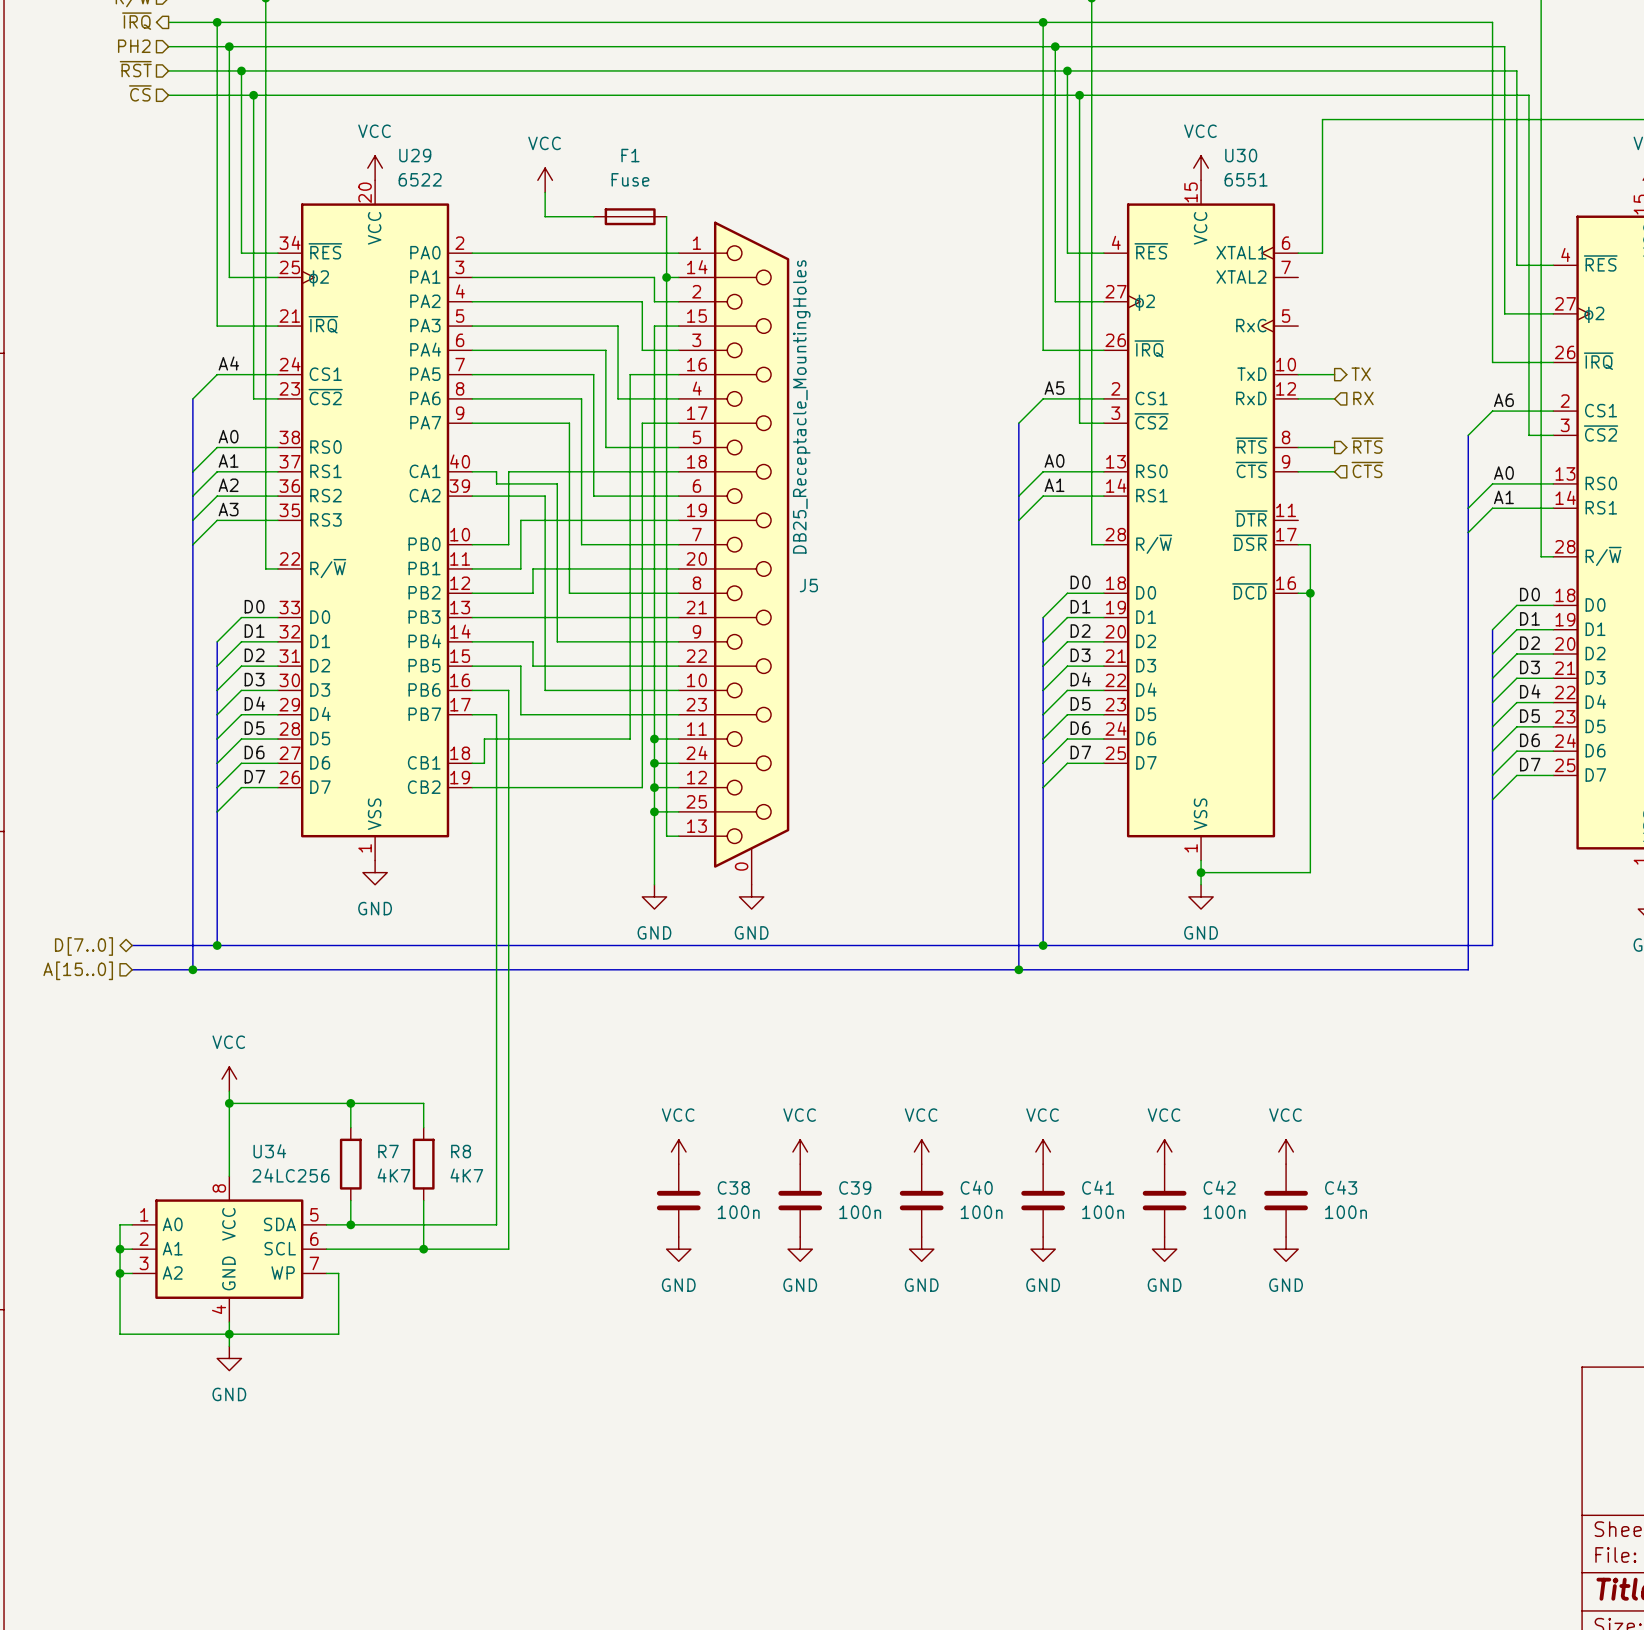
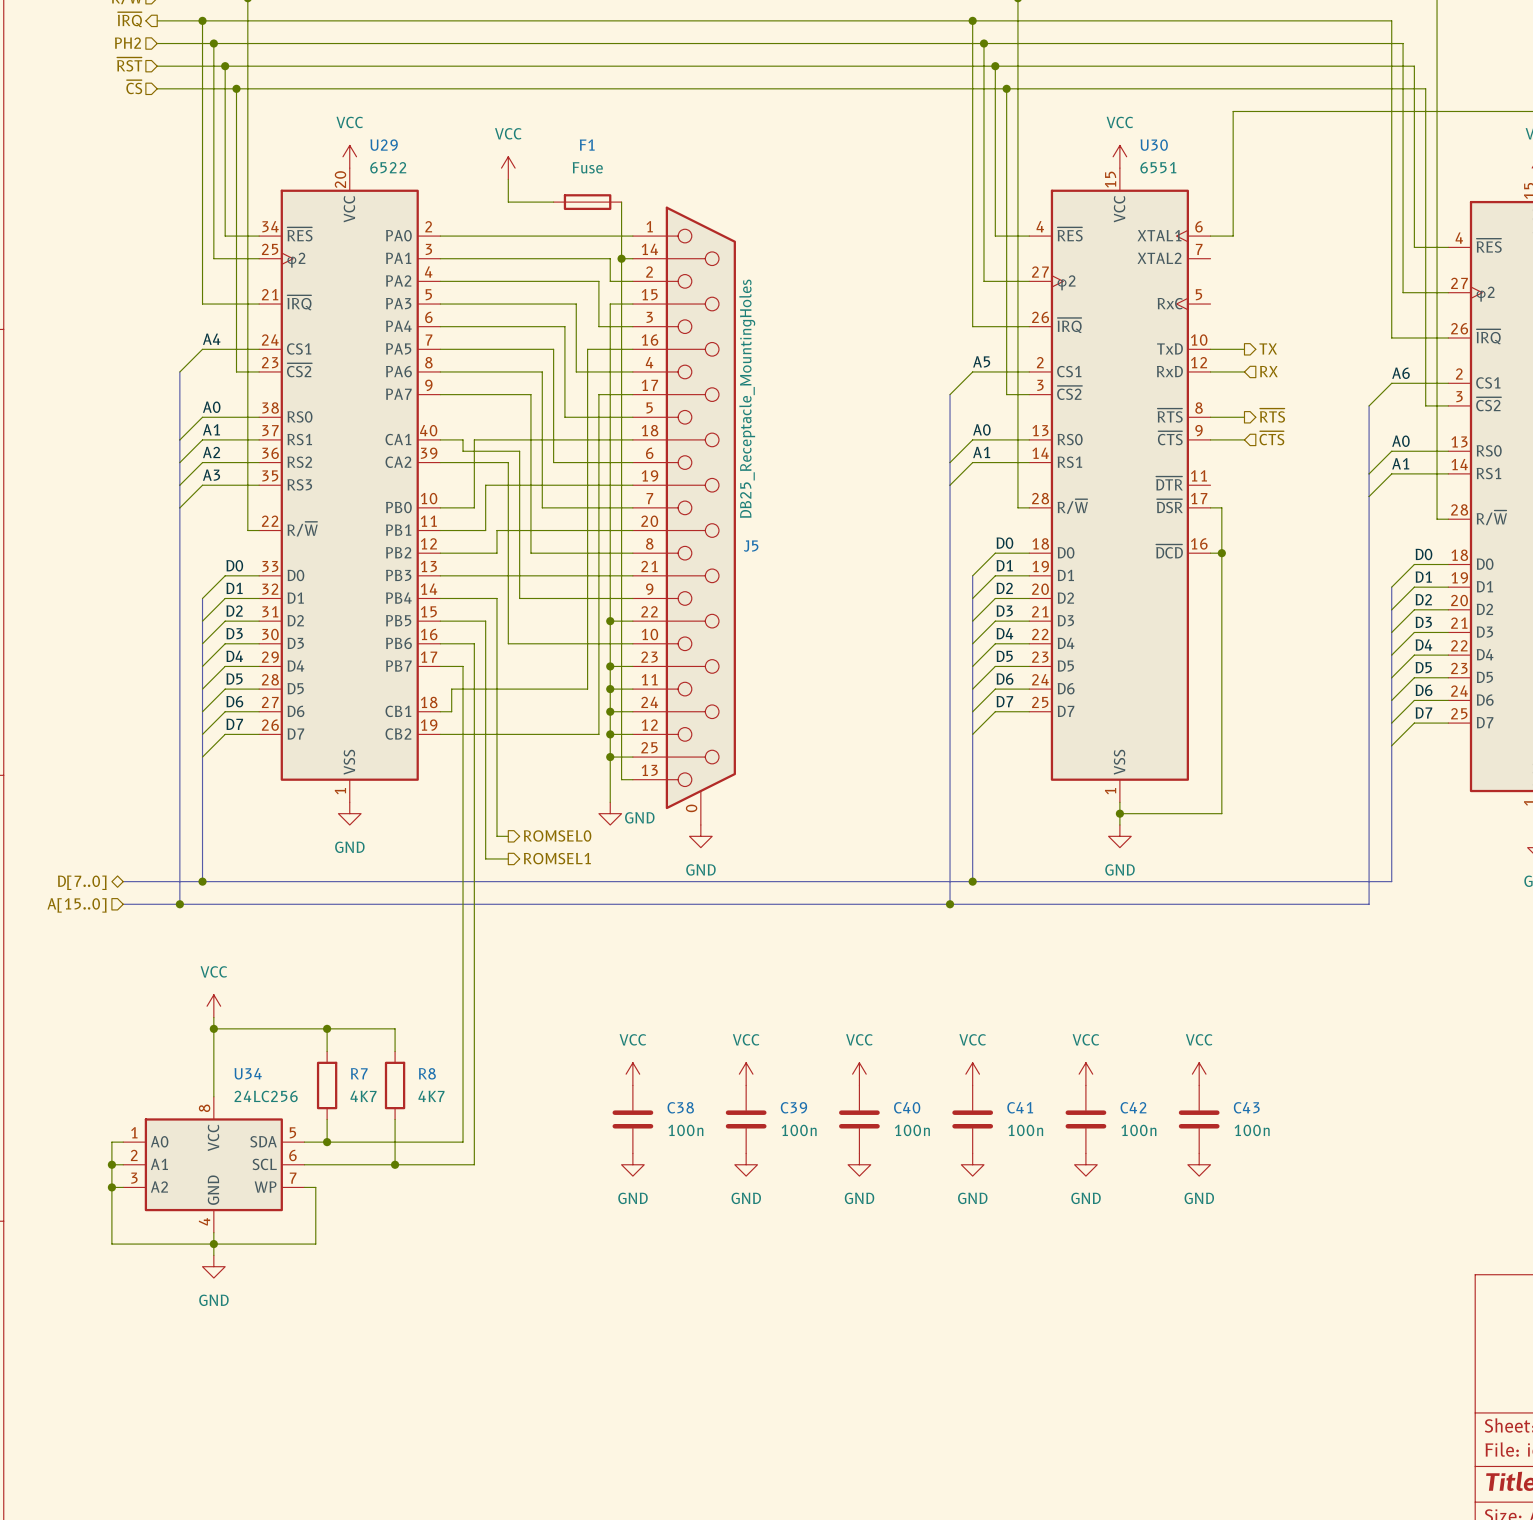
wire: (532, 666) (654, 666) -> (496, 621) (496, 836) (508, 836)
junction: none -> (610, 621)
wire: (520, 714) (654, 714) -> (485, 666) (485, 858) (508, 858)
junction: none -> (610, 666)
hierarchical label: none -> ROMSEL0 (557, 835)
power symbol position: GND (654, 896) -> GND (610, 813)
hierarchical label: none -> ROMSEL1 (557, 858)
power symbol text position: GND (654, 932) -> GND (639, 817)

